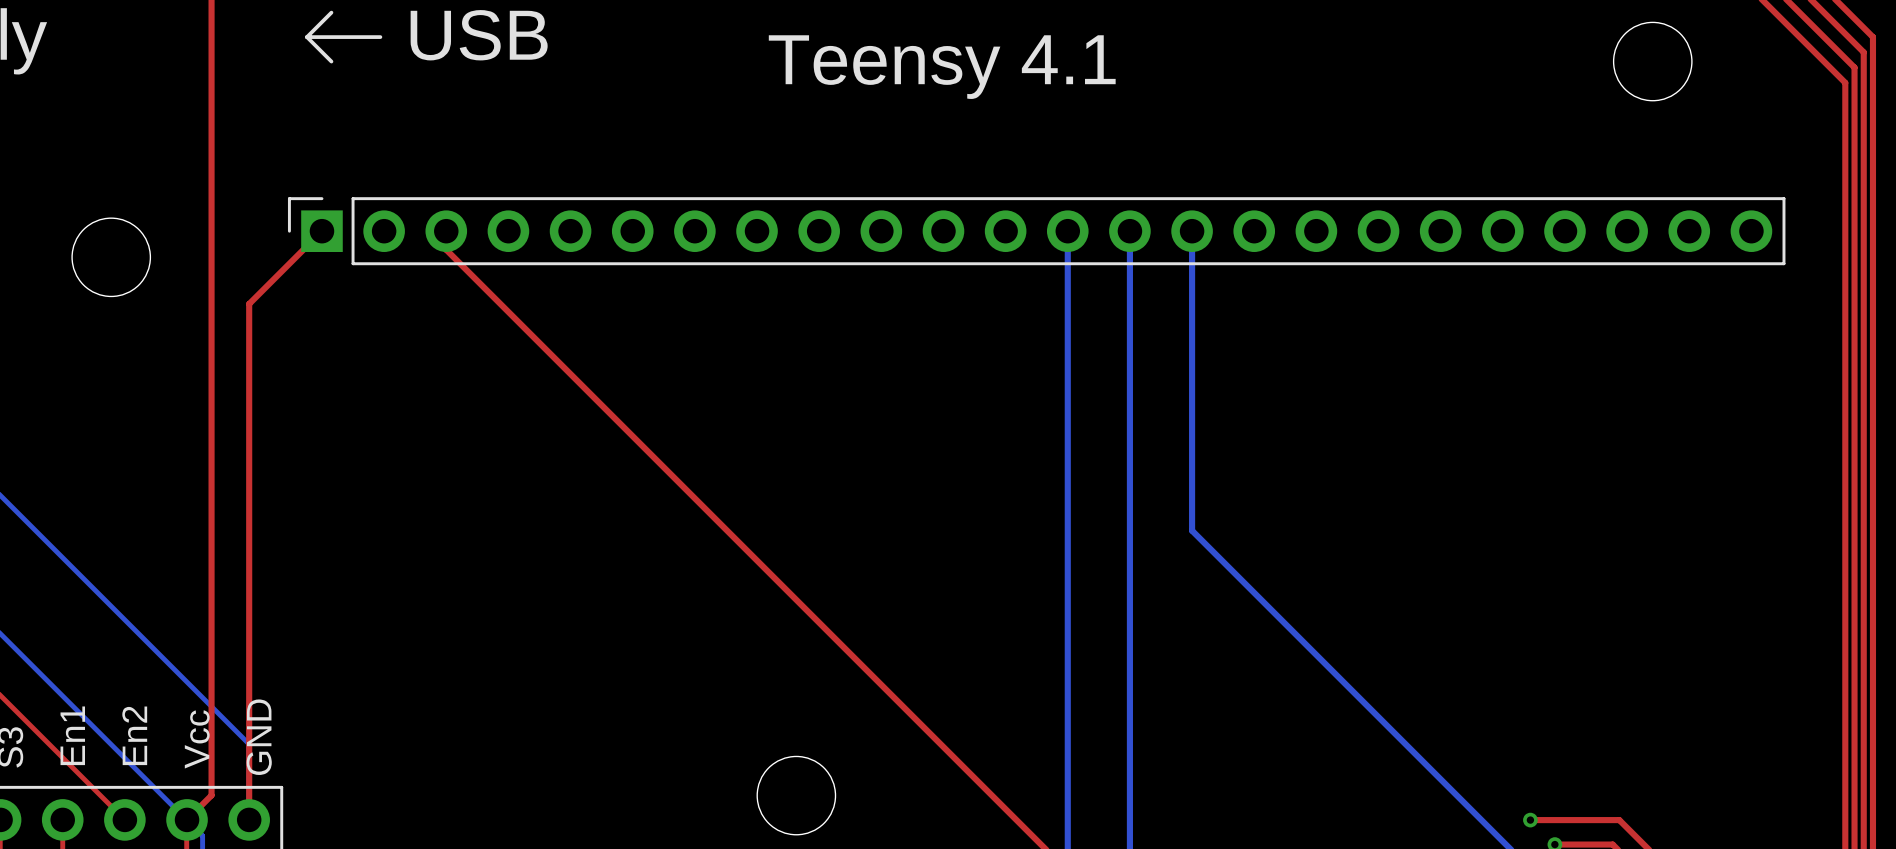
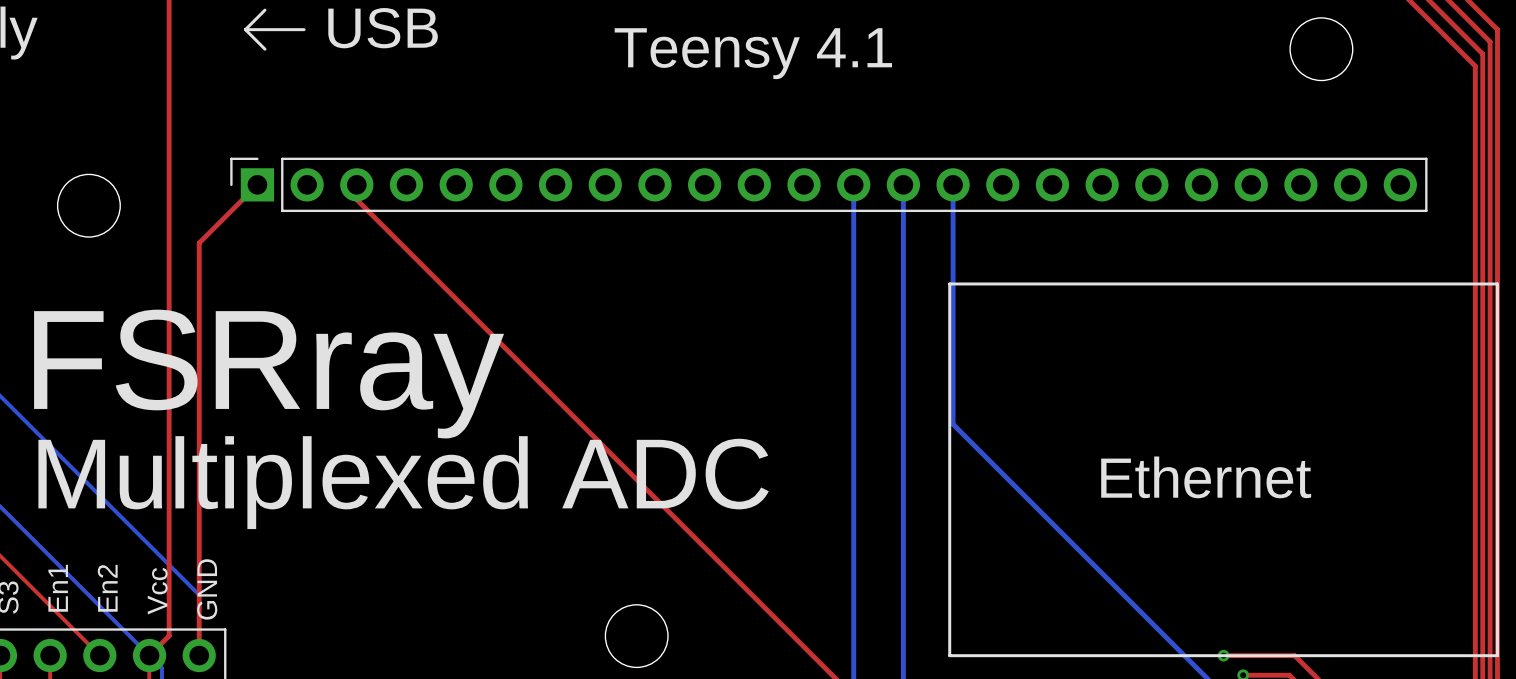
line: none -> (949, 283) (1497, 283) (1497, 655) (949, 655) (949, 283)
text: none -> FSRray (269, 374)
text: none -> Ethernet (1206, 477)
text: none -> Multiplexed ADC (403, 482)

